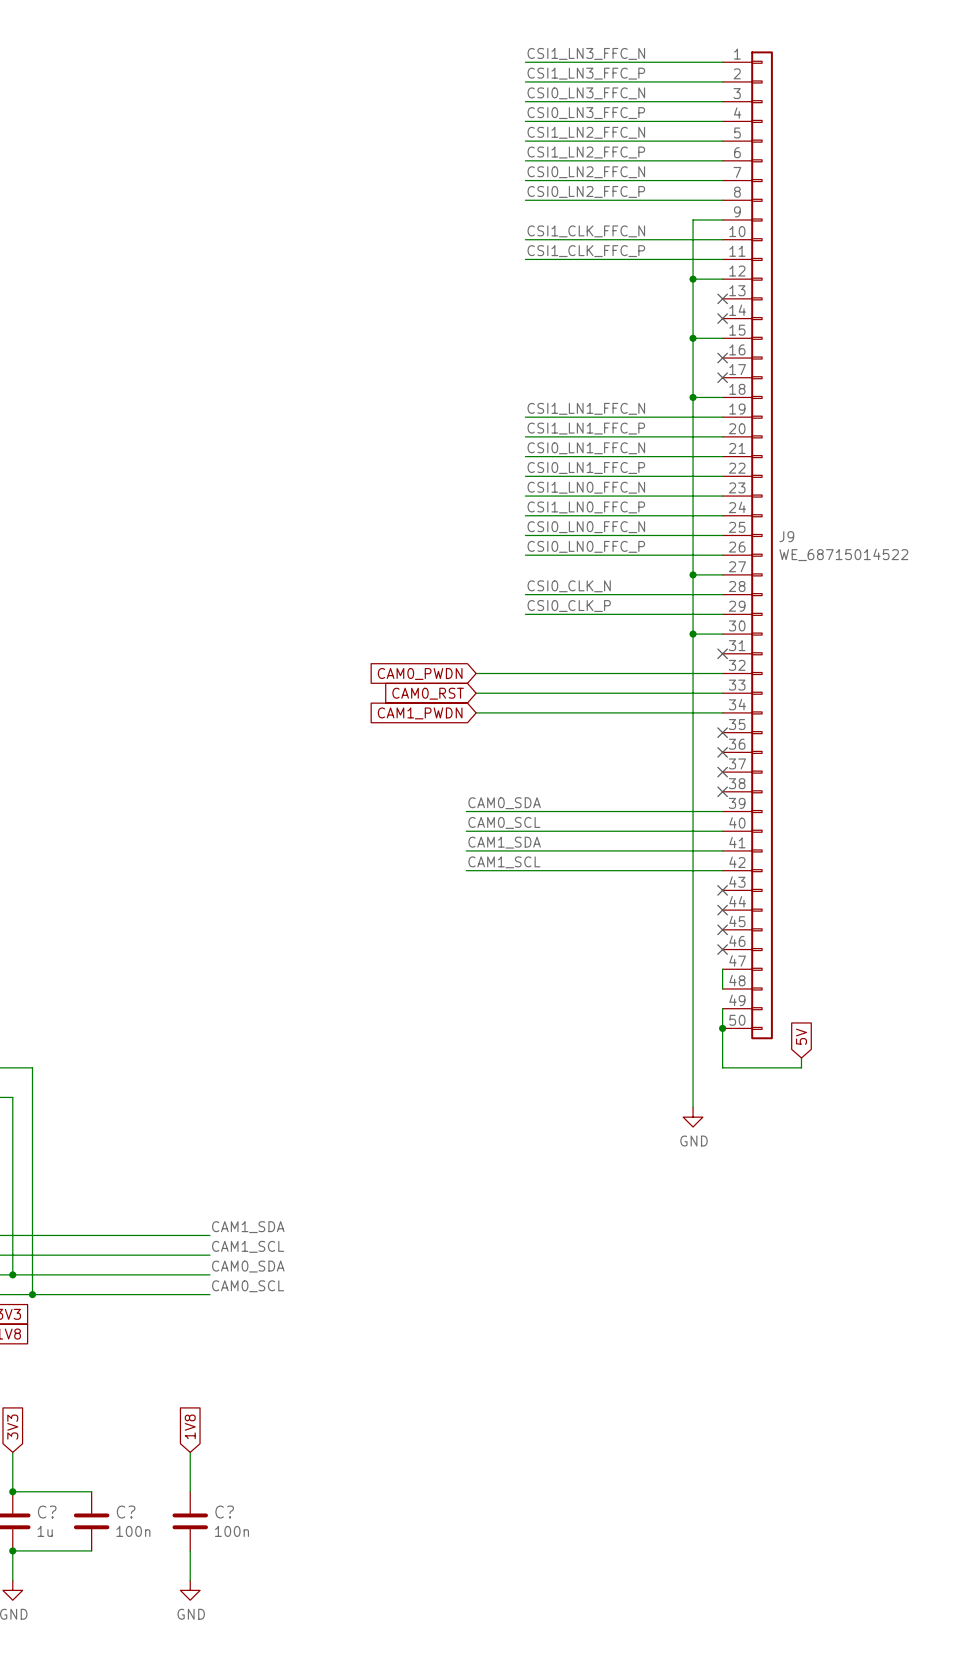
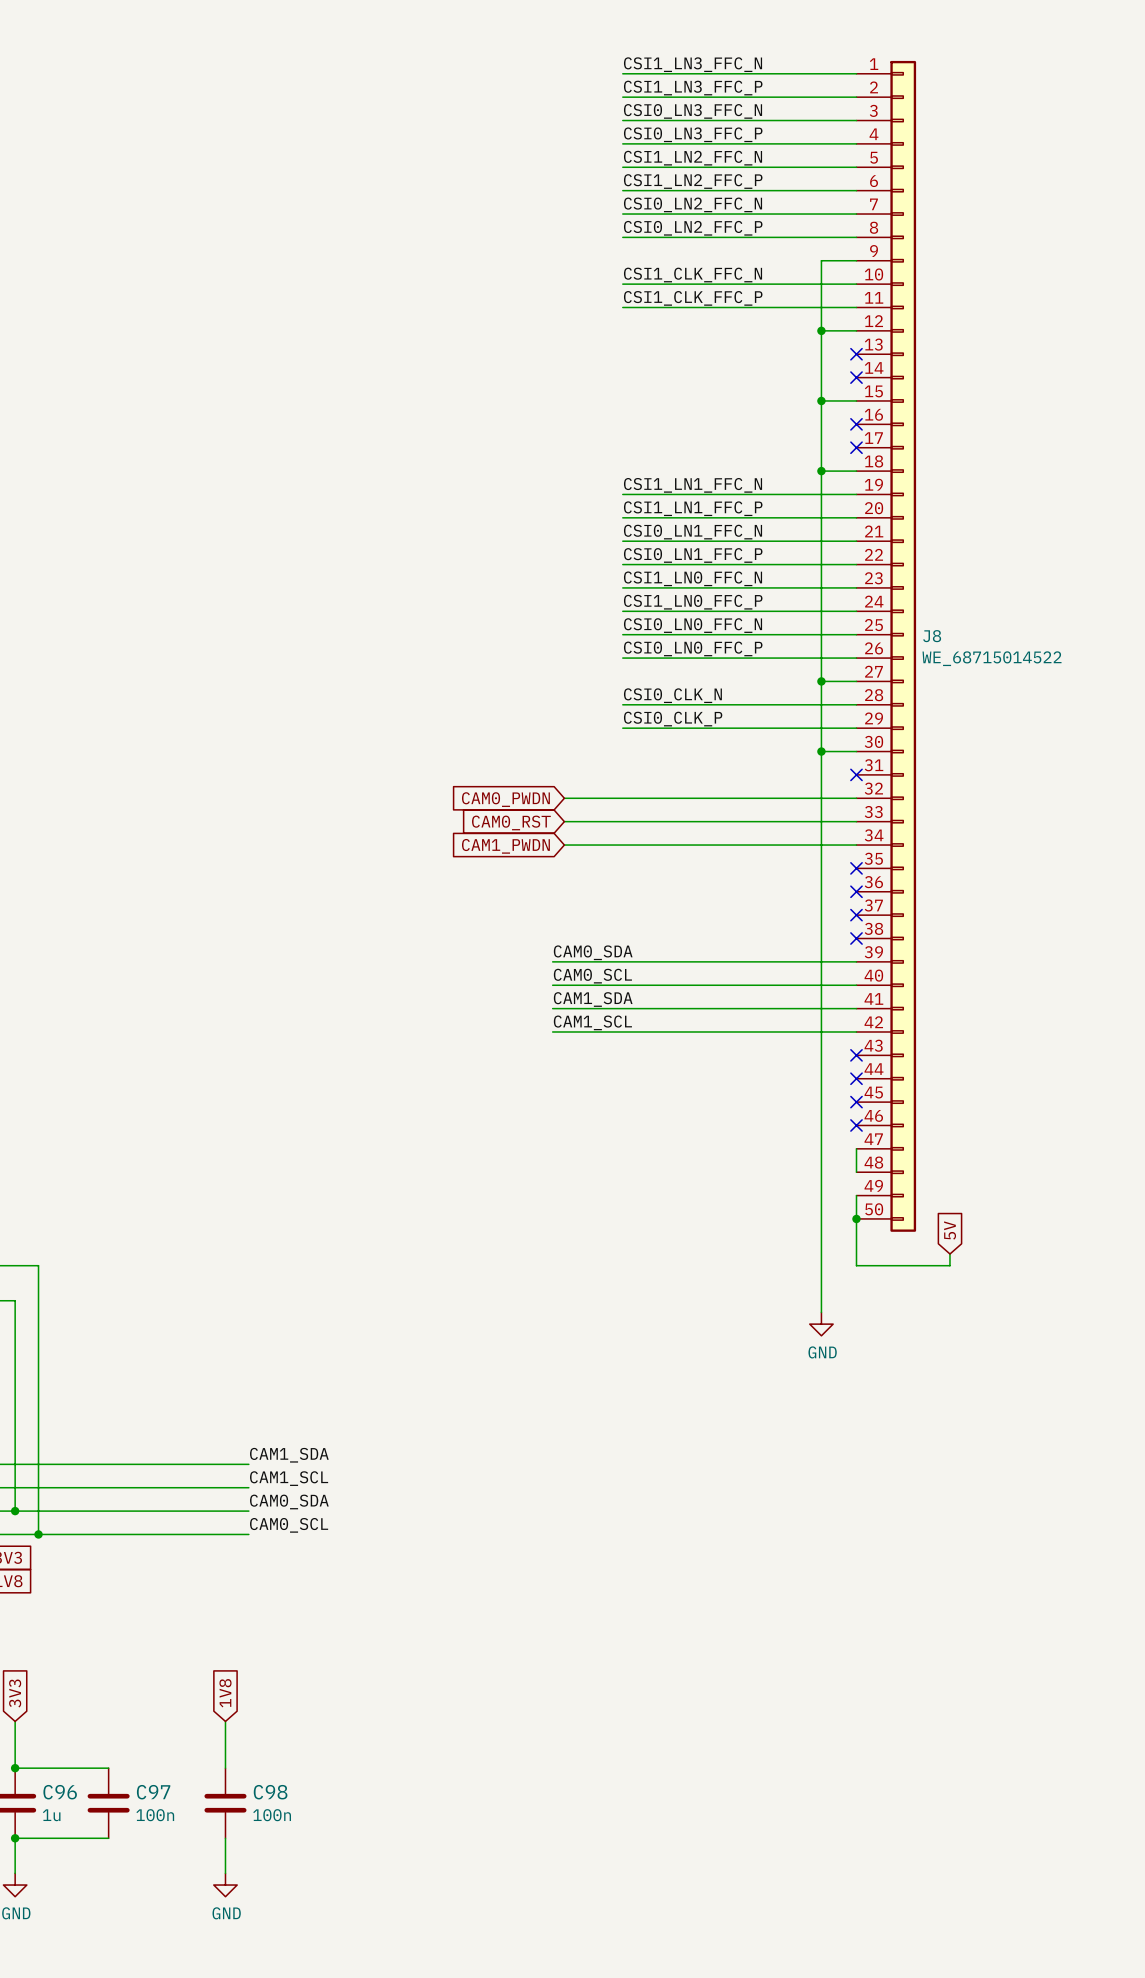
J9 name: J9 (786, 536) -> J8 (932, 636)
C? name: C? (47, 1512) -> C96 (60, 1792)
C? name: C? (126, 1512) -> C97 (153, 1792)
C? name: C? (224, 1512) -> C98 (270, 1792)

